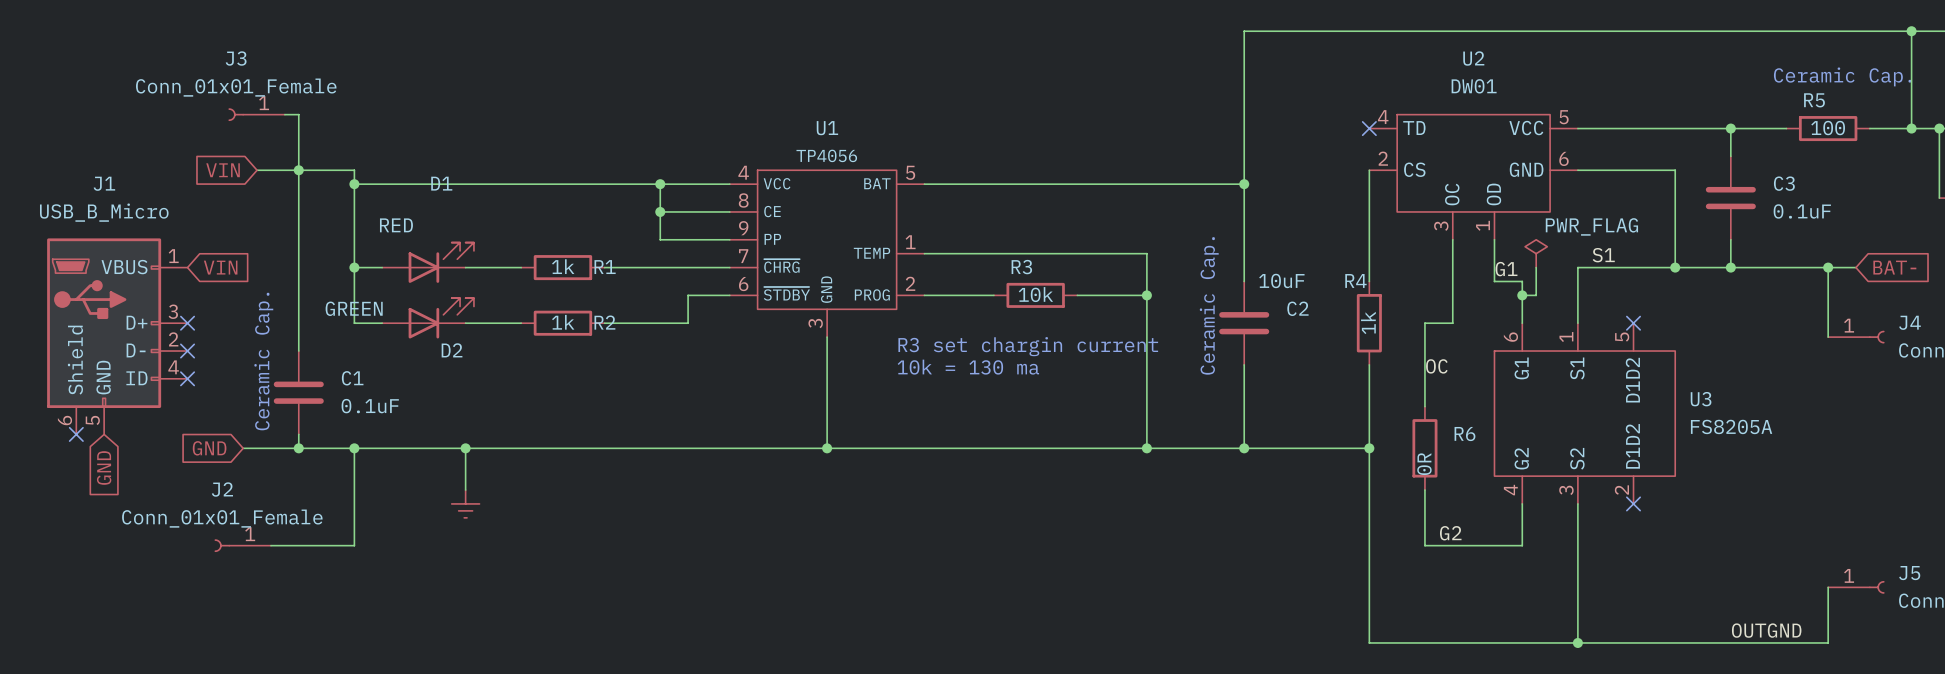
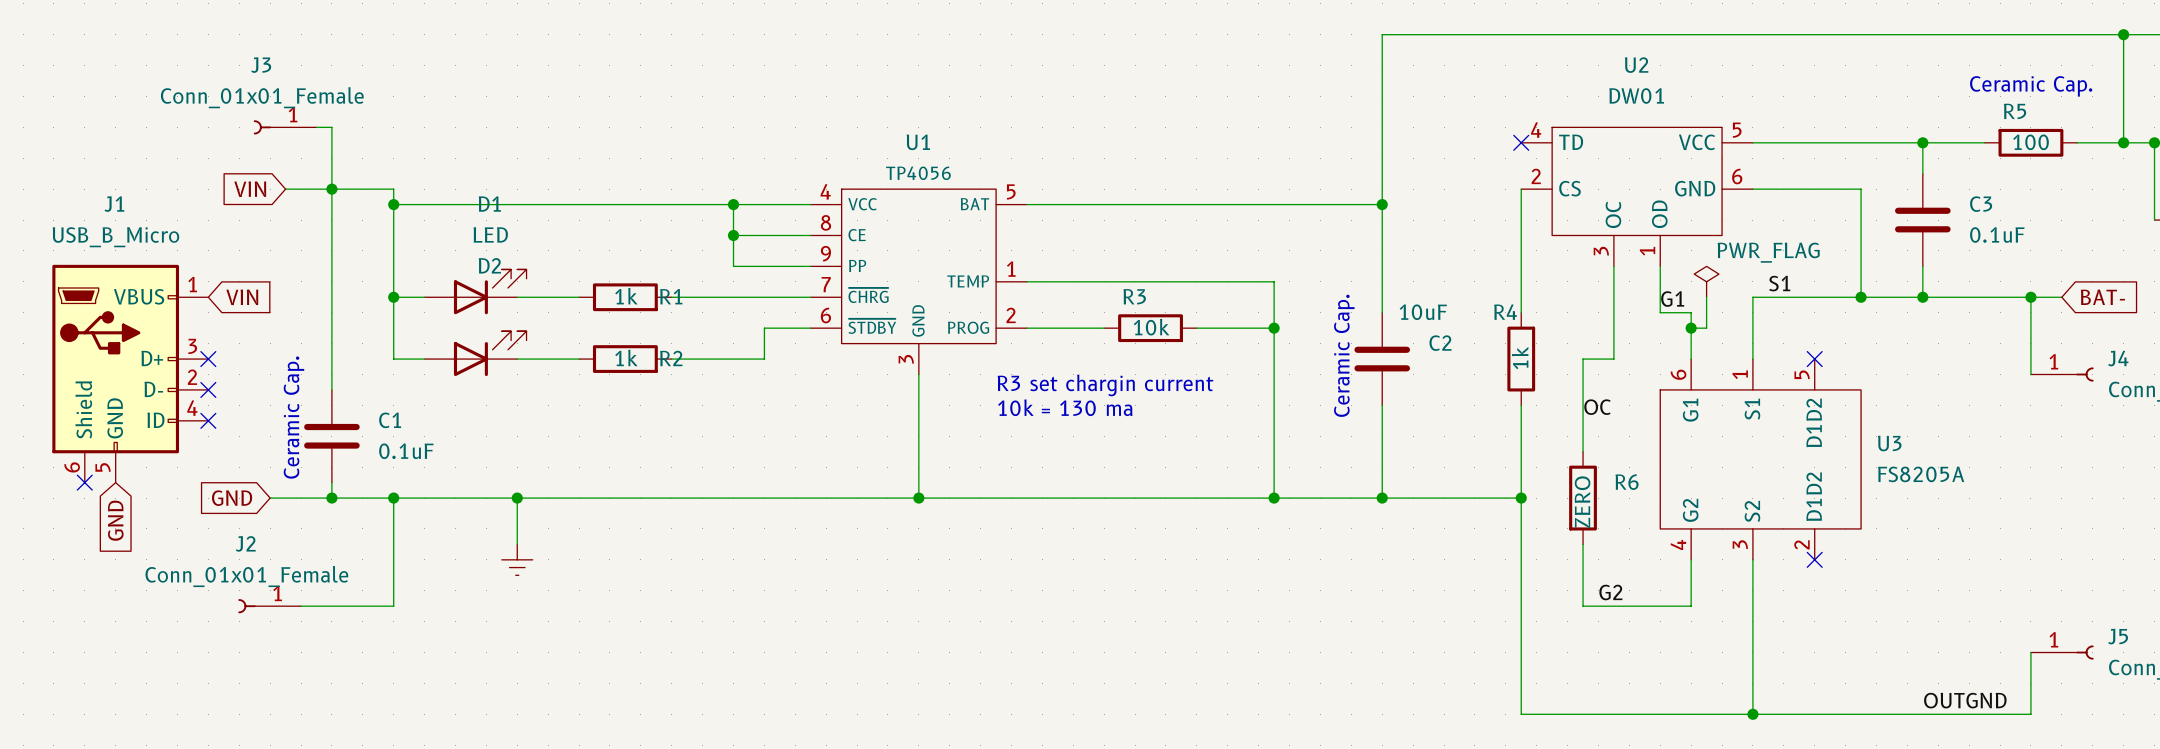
D1 value: RED (396, 225) -> LED (490, 234)
D2 value: GREEN (354, 308) -> none
D2 name position: D2 (452, 350) -> D2 (489, 265)
R6 value: 0R (1424, 464) -> ZERO (1582, 502)

